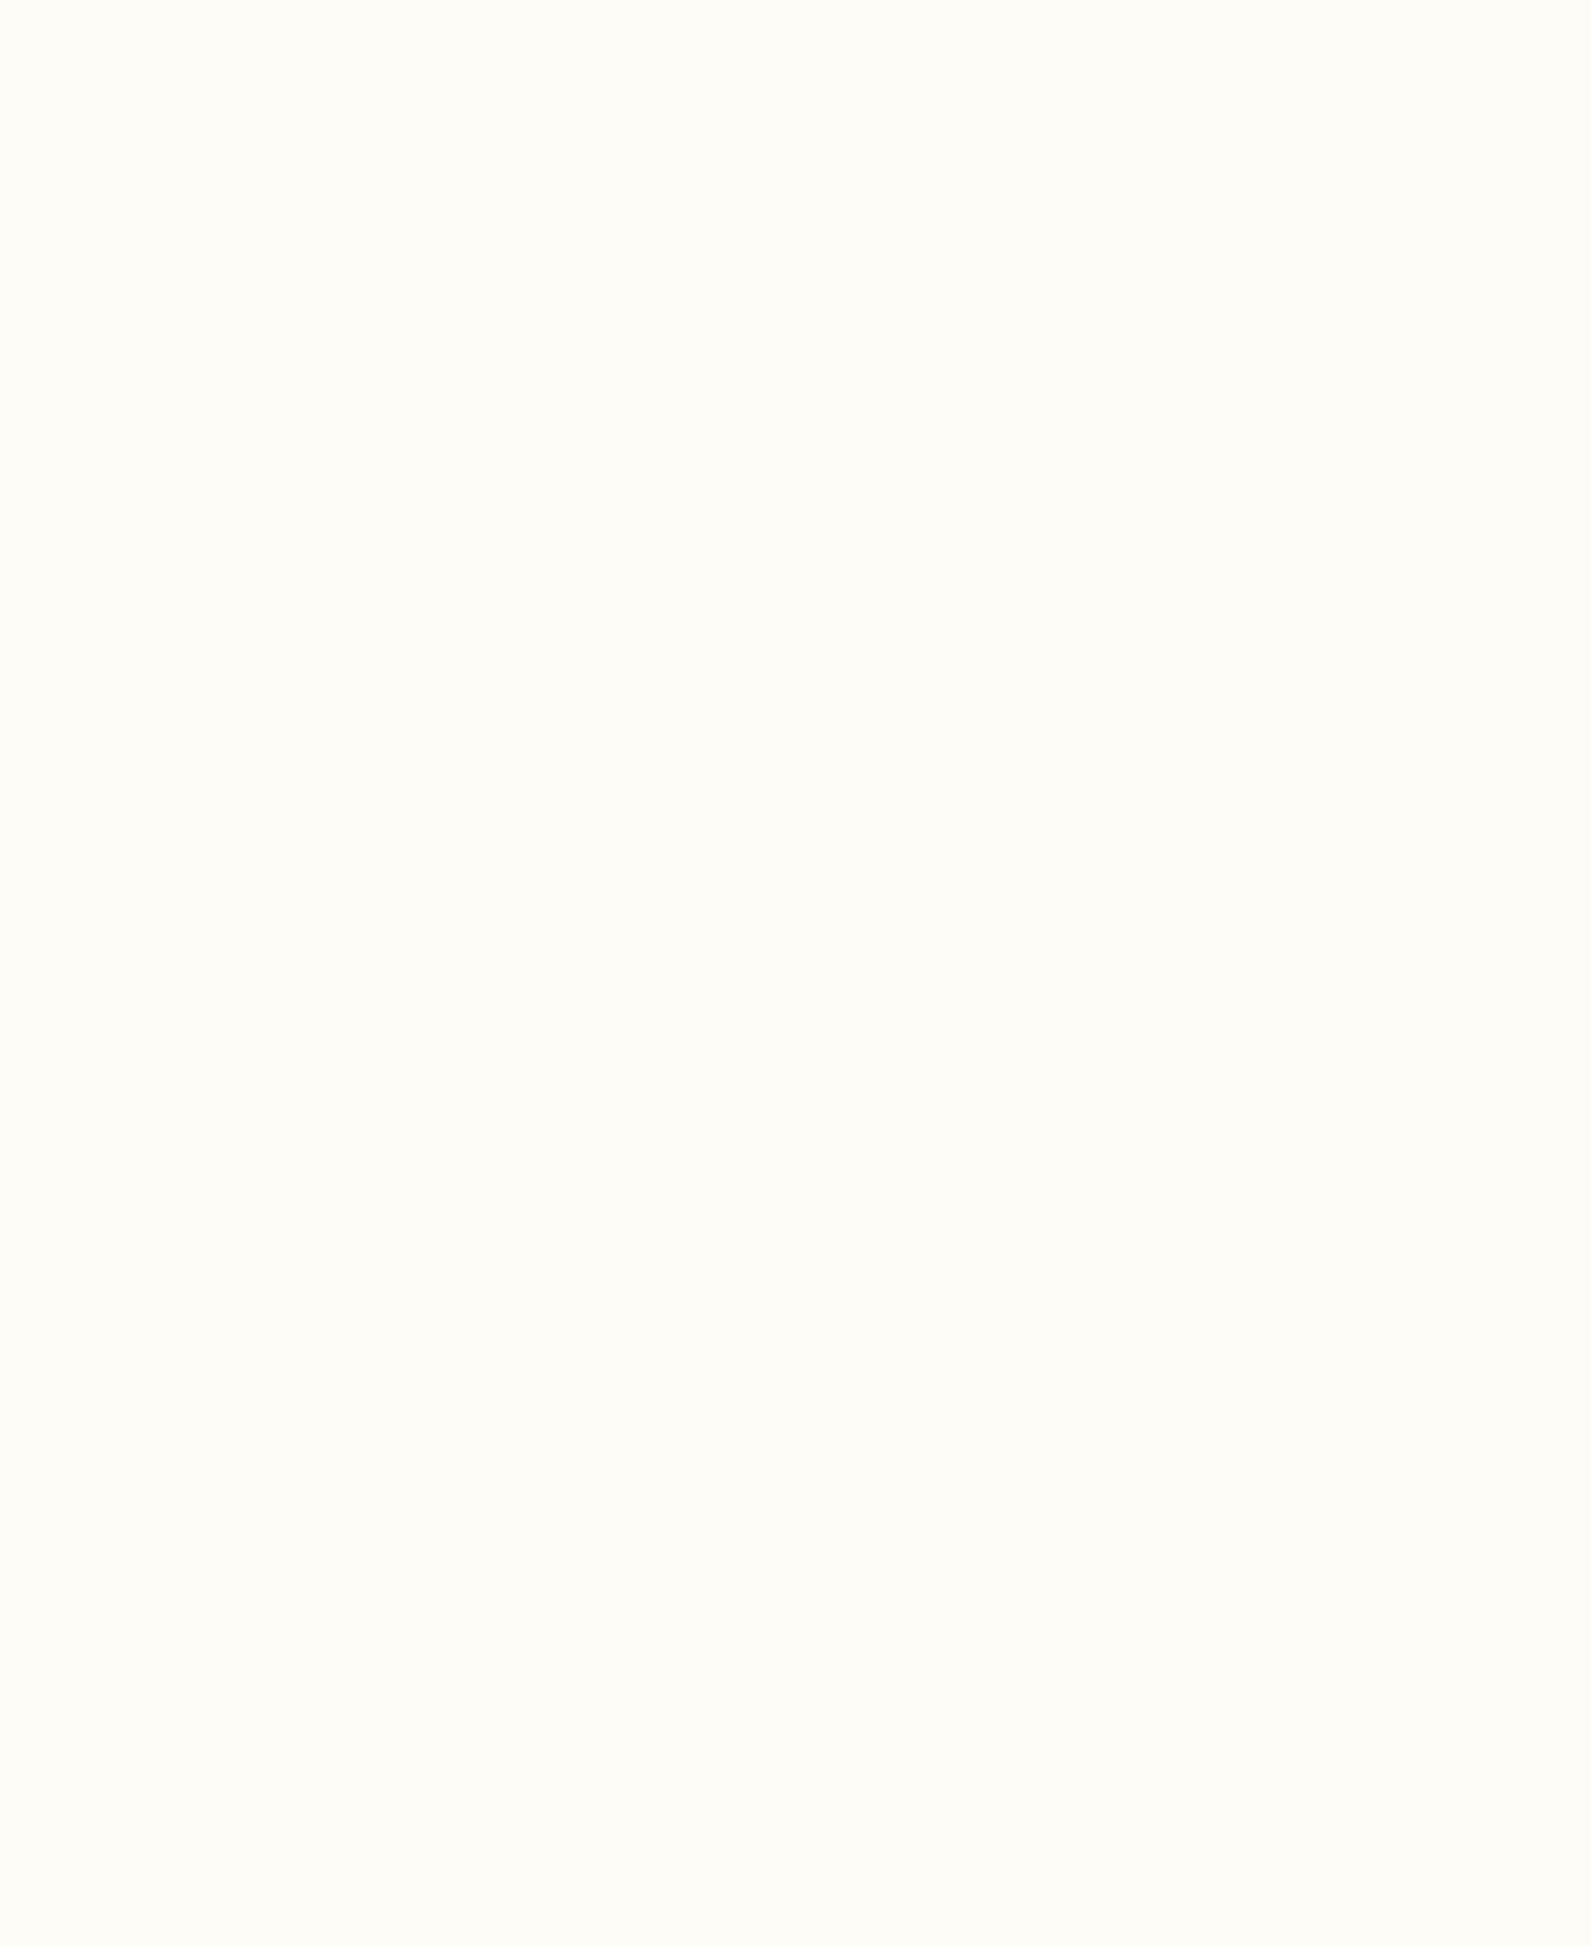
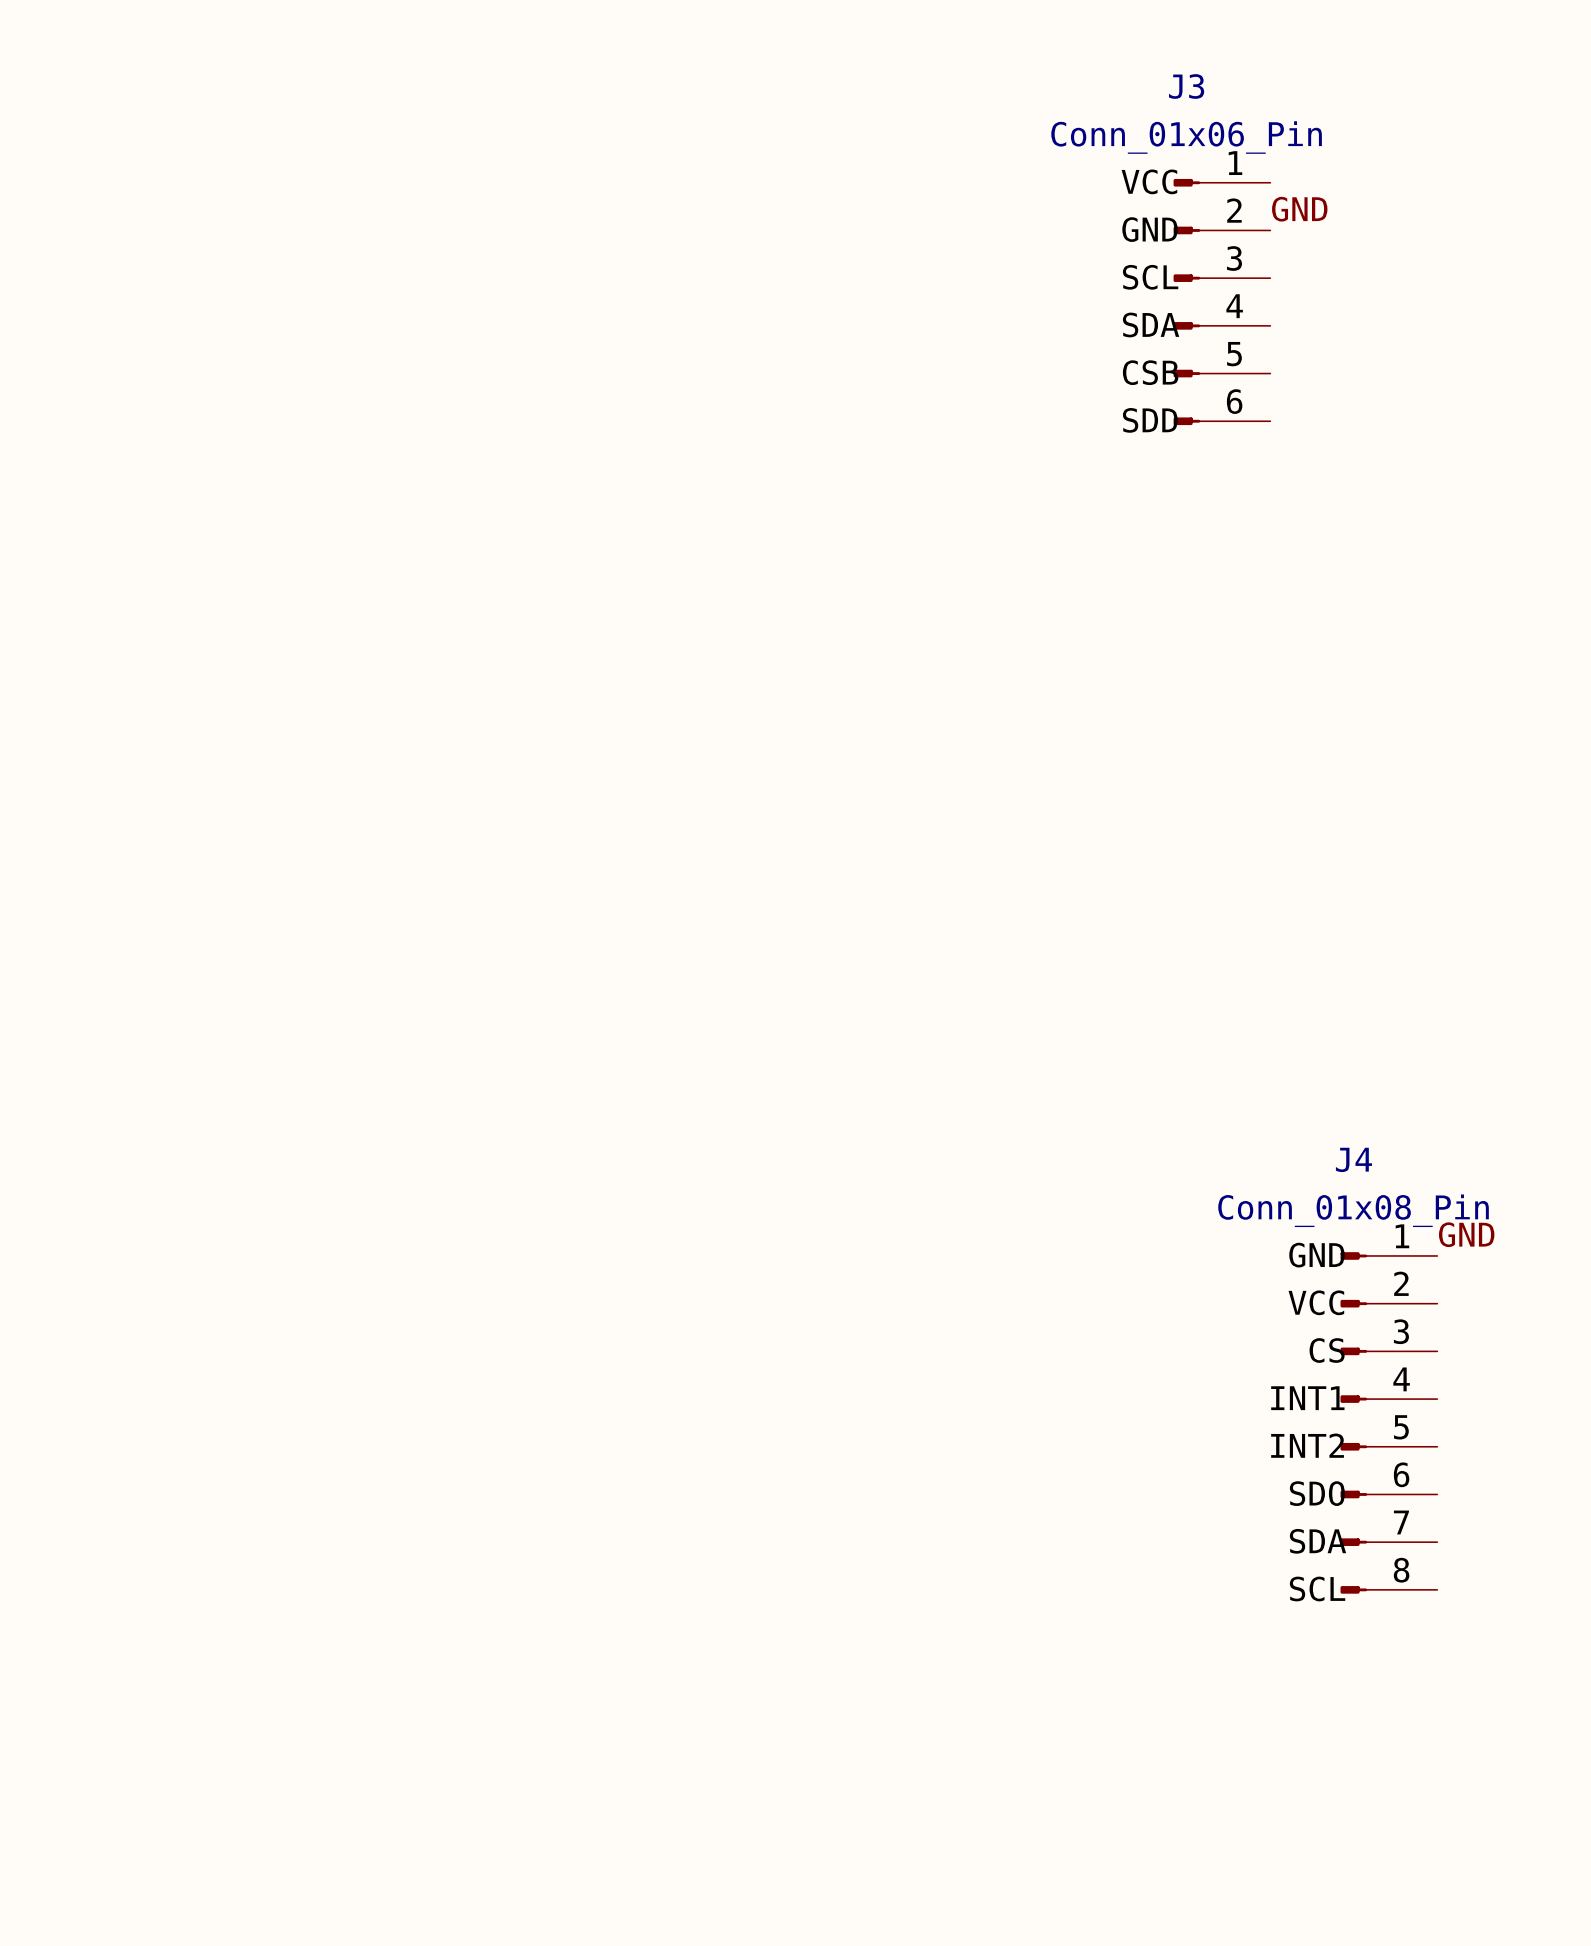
label: none -> GND (1299, 209)
J3: none -> Conn_01x06_Pin (1221, 302)
label: none -> GND (1466, 1234)
J4: none -> Conn_01x08_Pin (1388, 1422)

